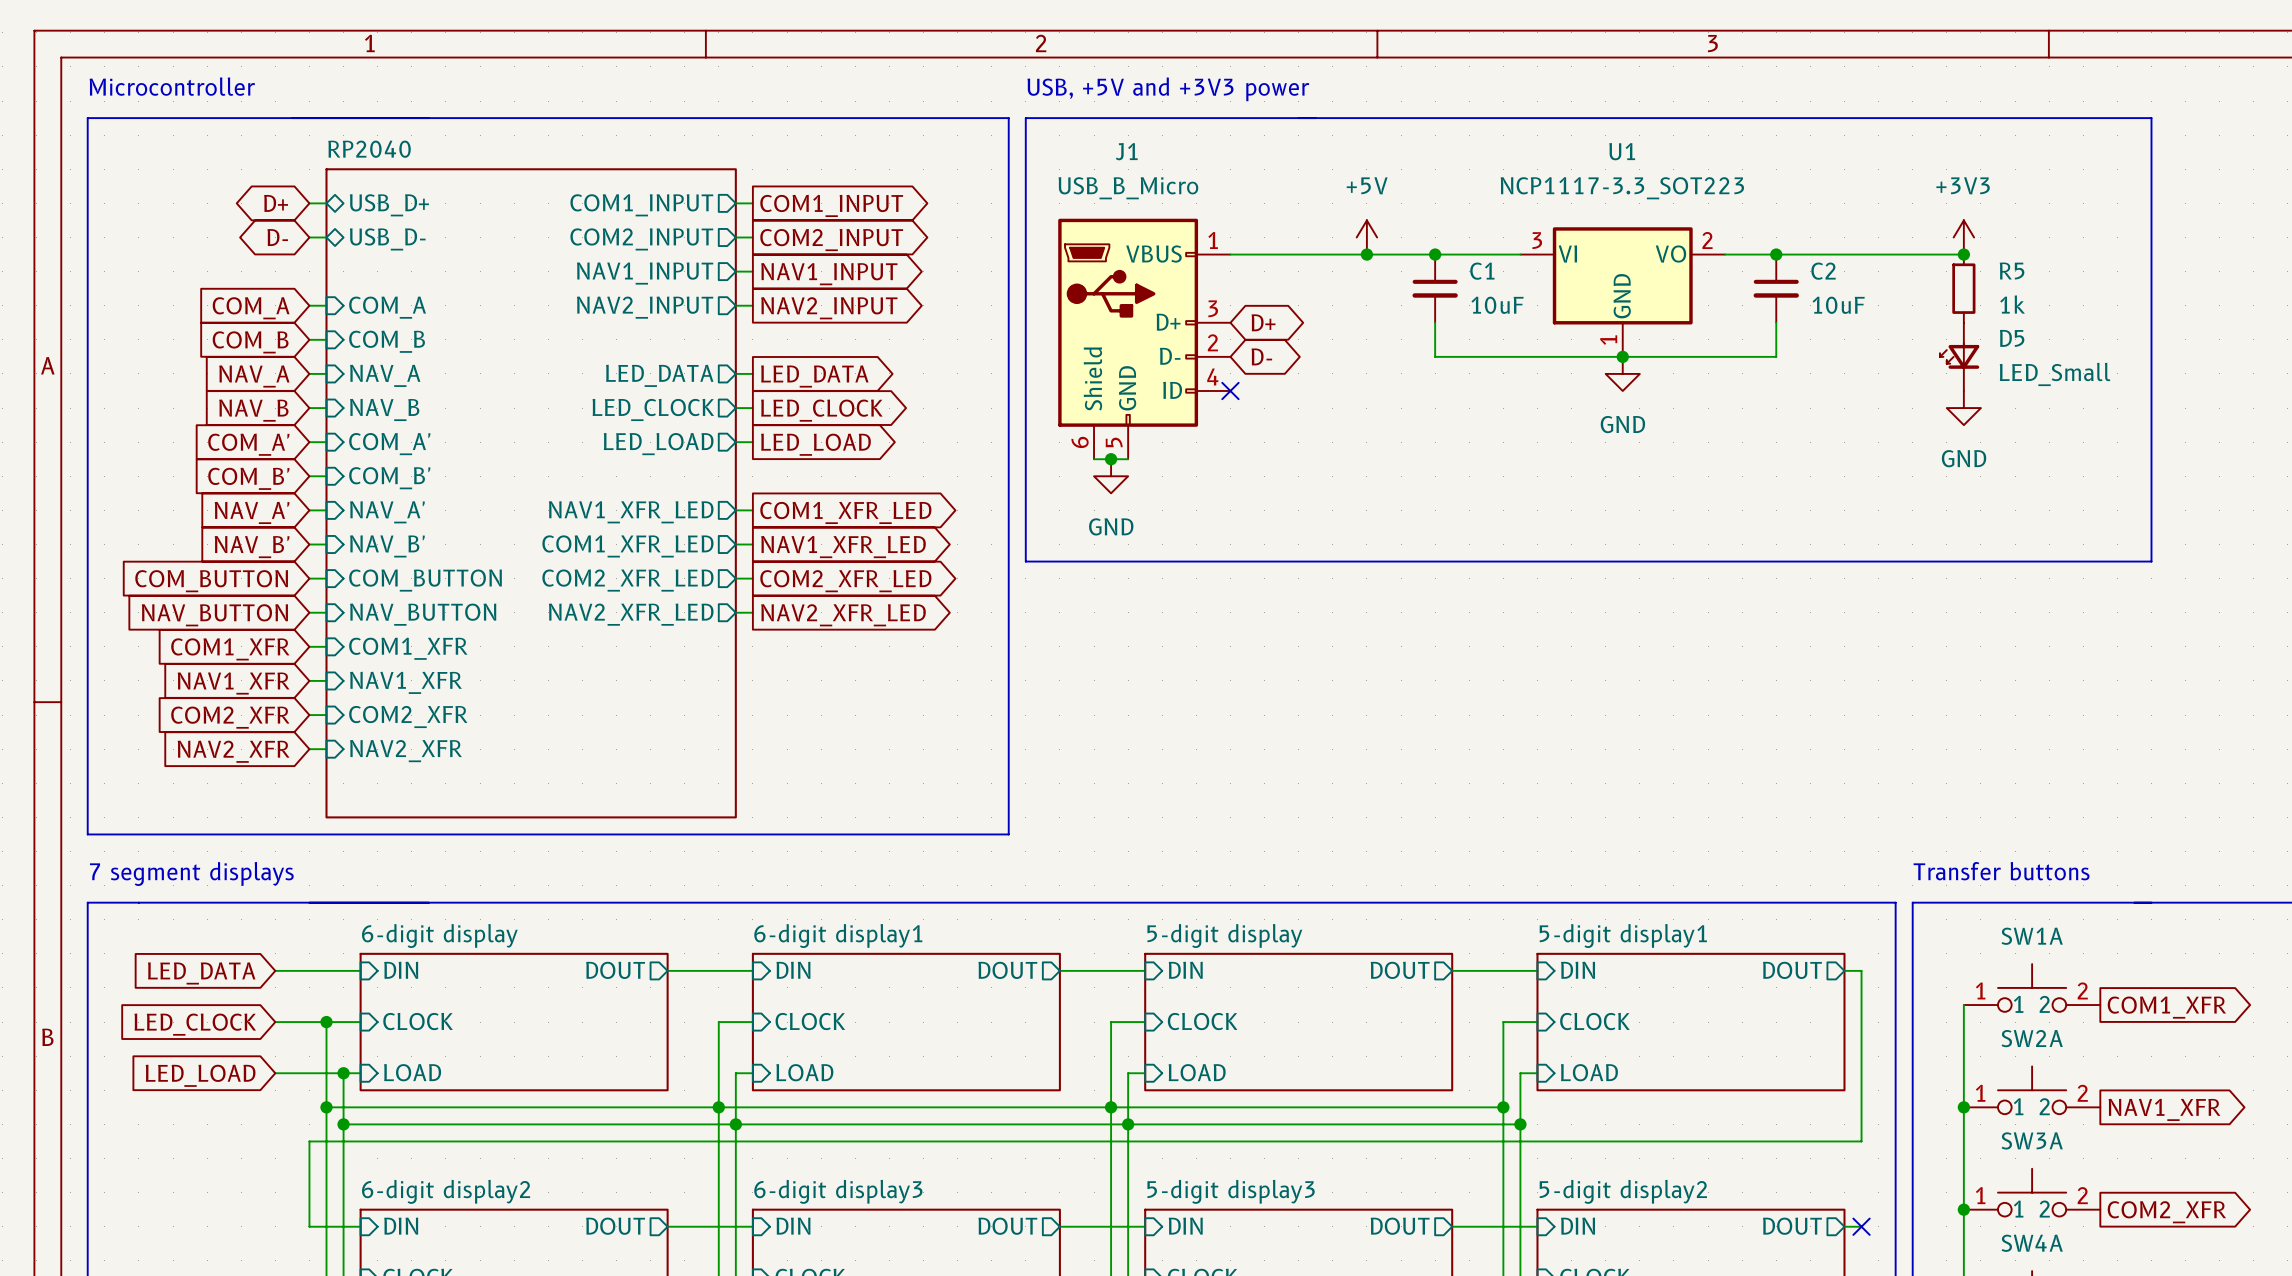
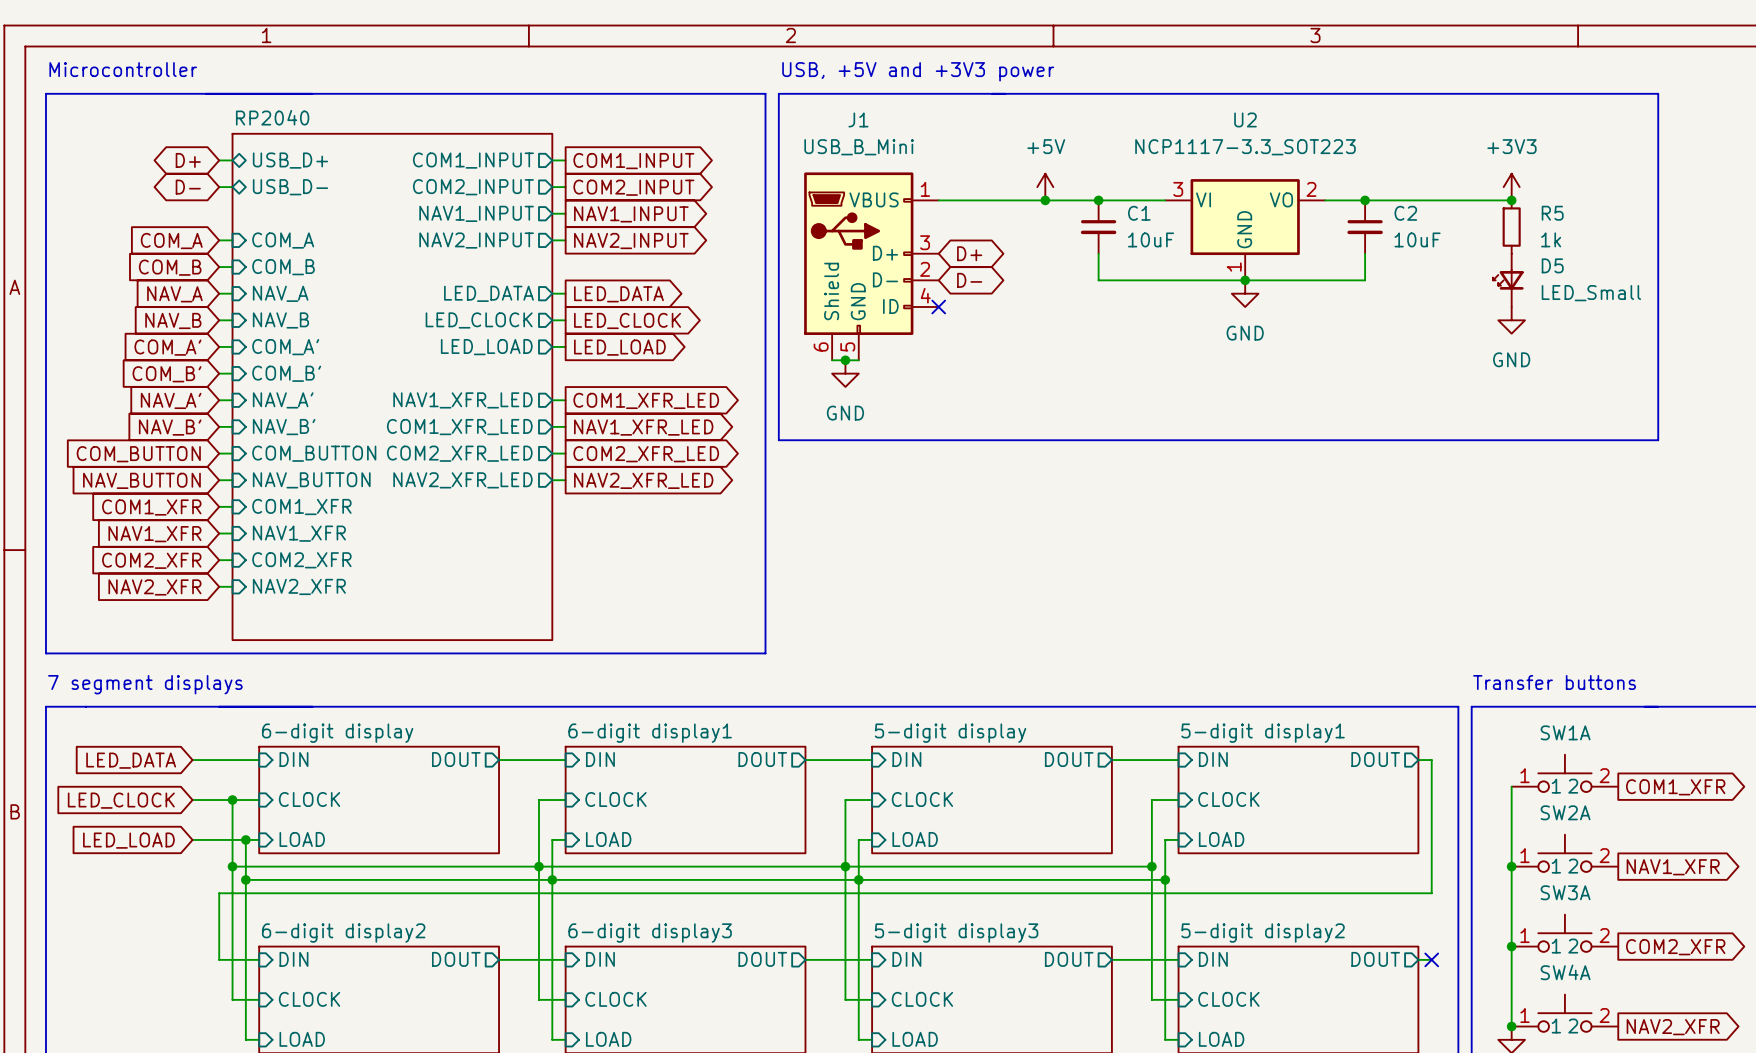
U1 name: U1 (1622, 151) -> U2 (1245, 119)
J1 value: USB_B_Micro (1128, 188) -> USB_B_Mini (859, 147)

